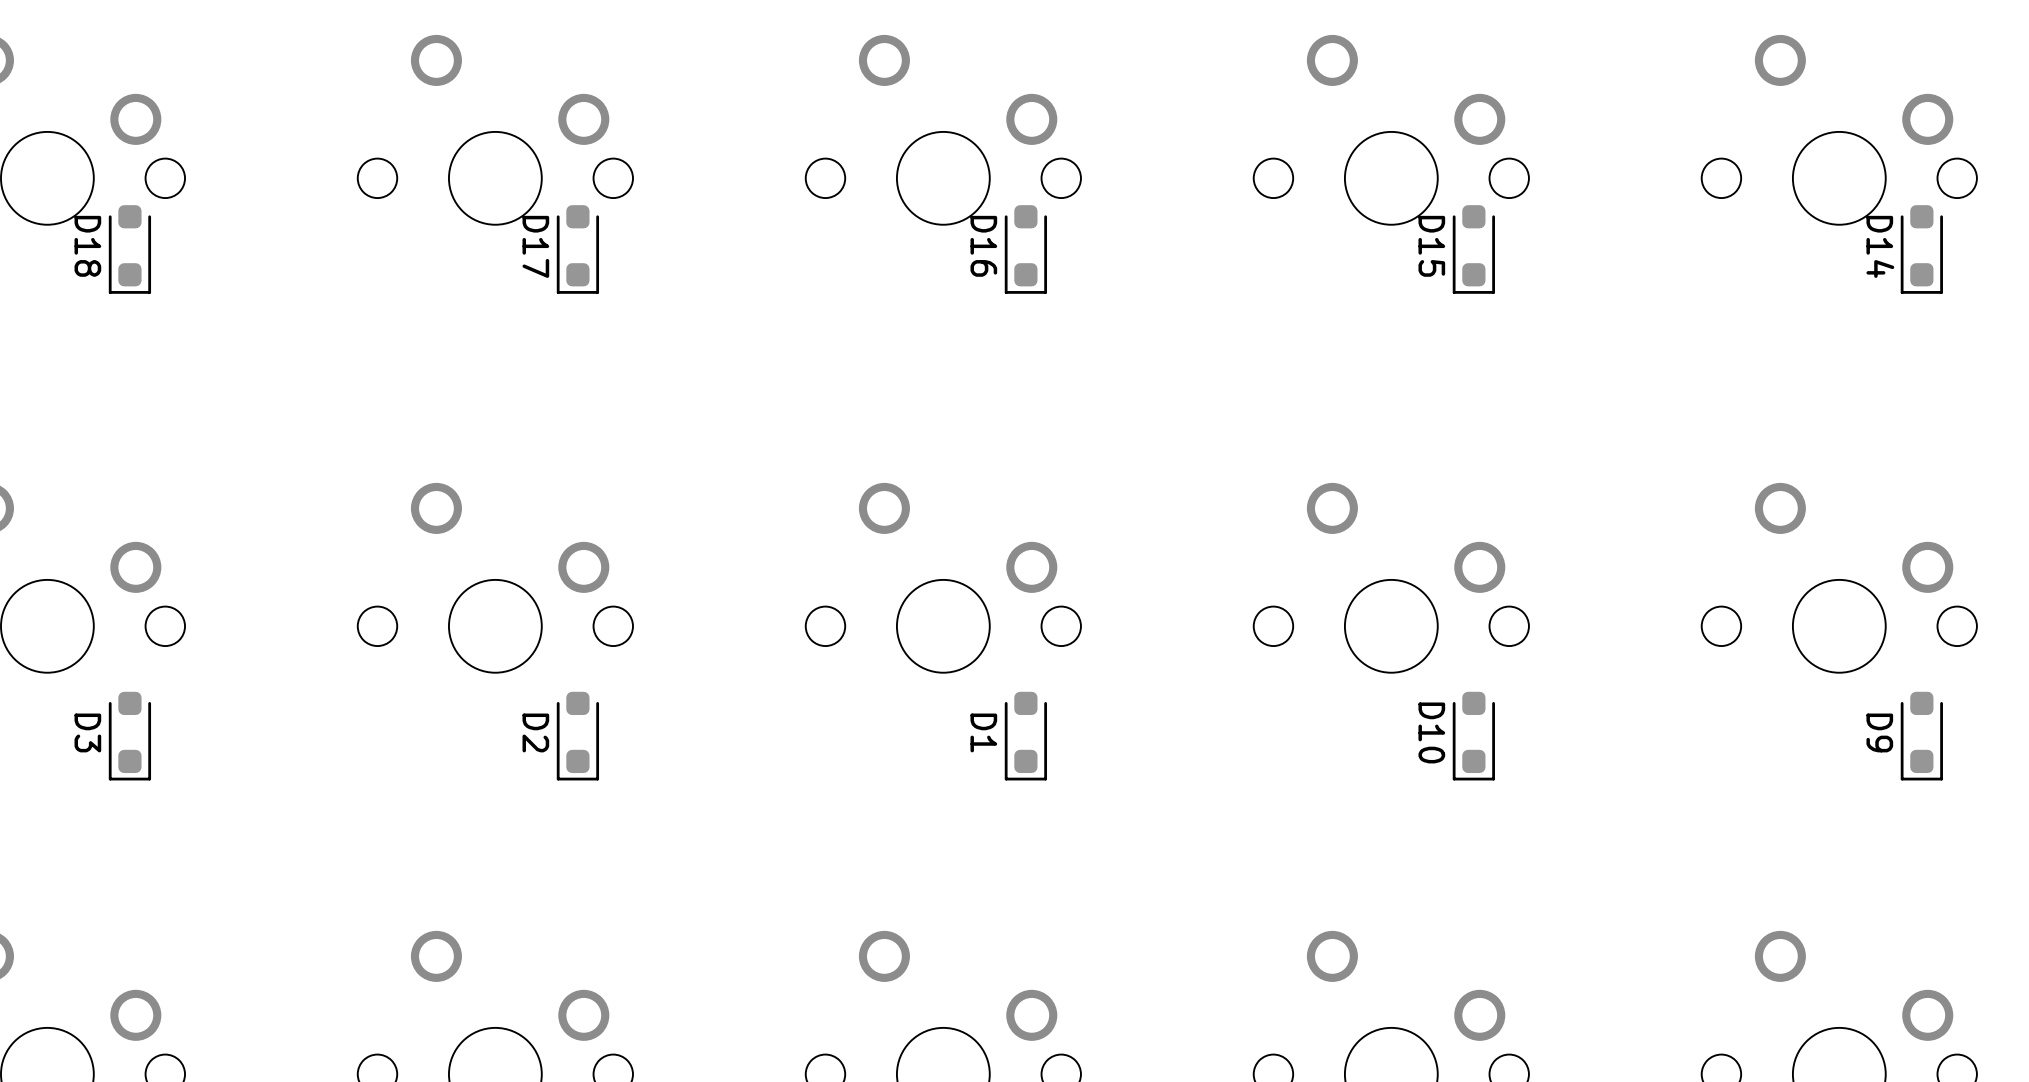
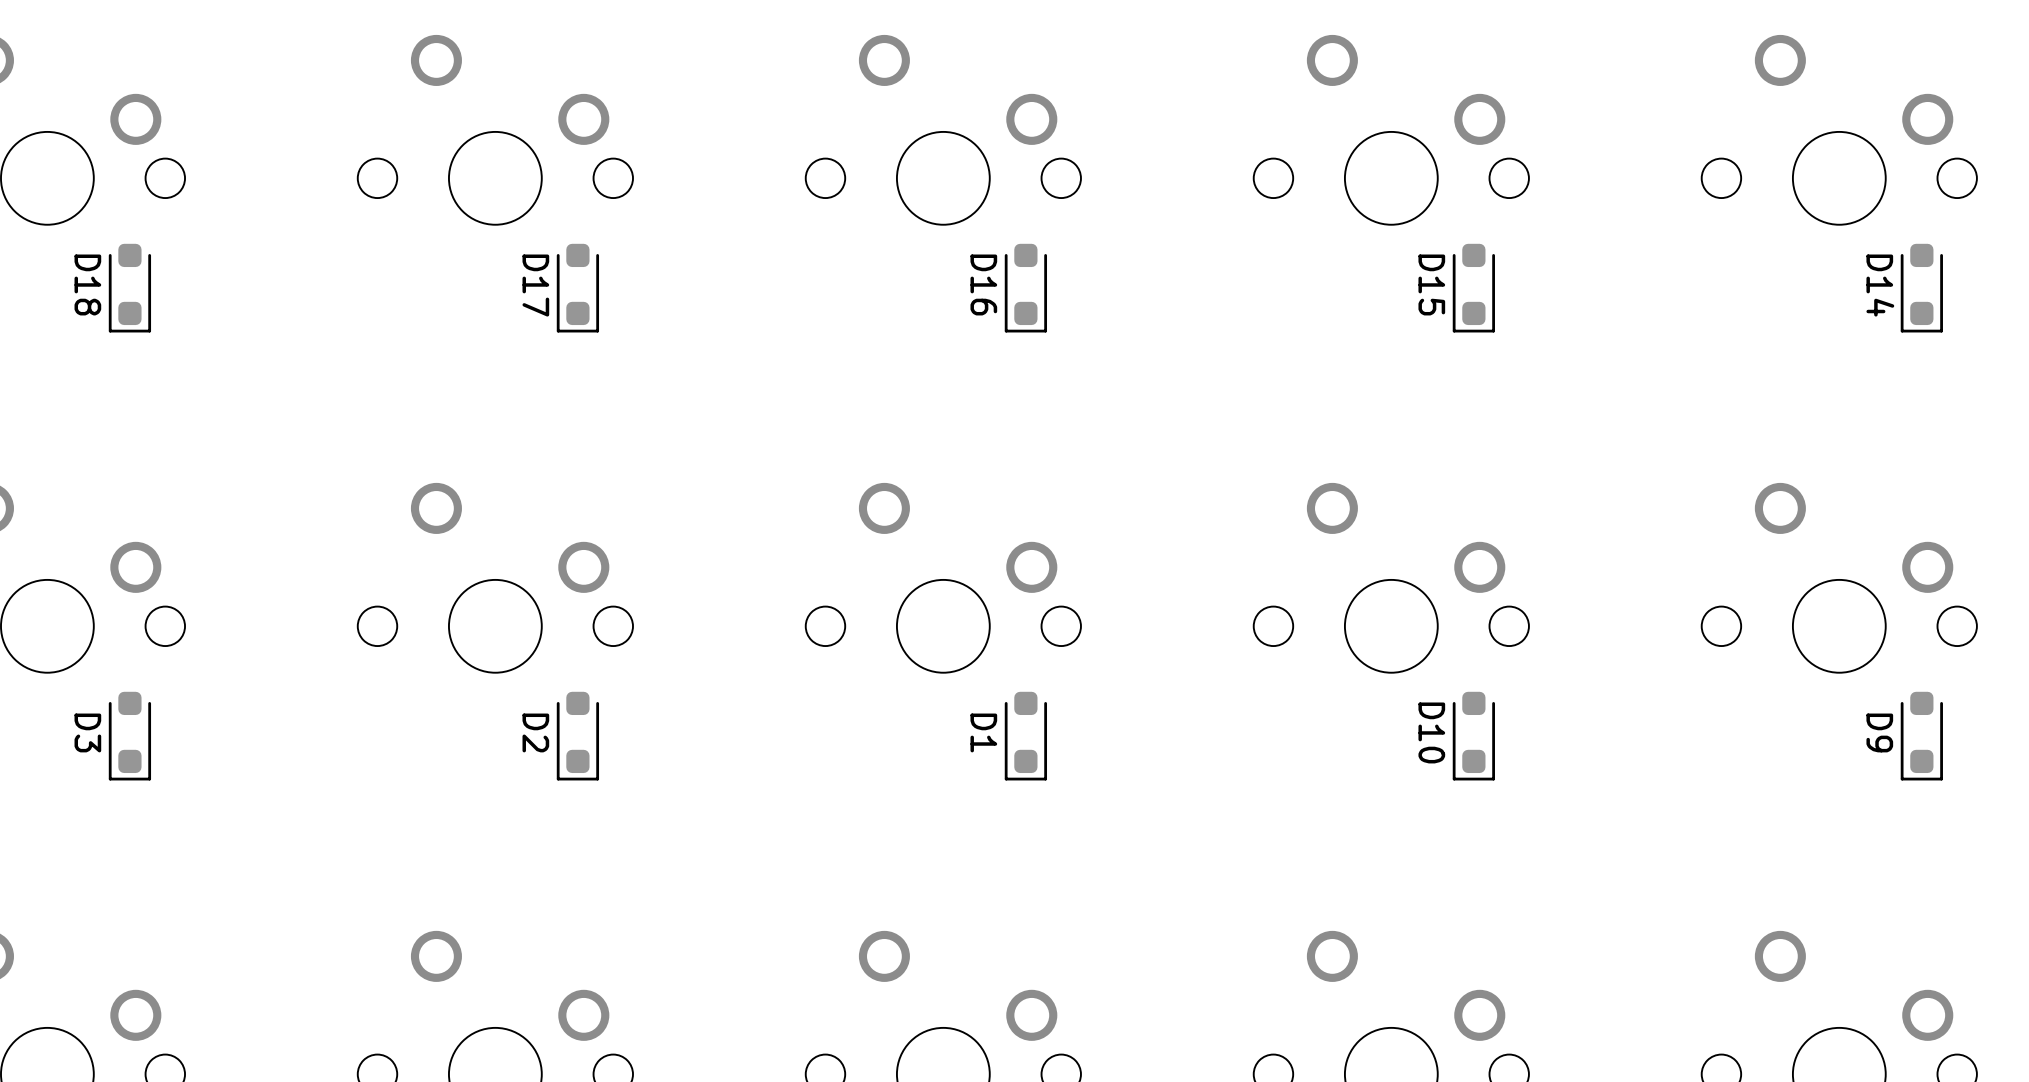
D18 position: (129, 249) -> (129, 288)
D17 position: (577, 249) -> (577, 288)
D16 position: (1025, 249) -> (1025, 288)
D15 position: (1473, 249) -> (1473, 288)
D14 position: (1921, 249) -> (1921, 288)

